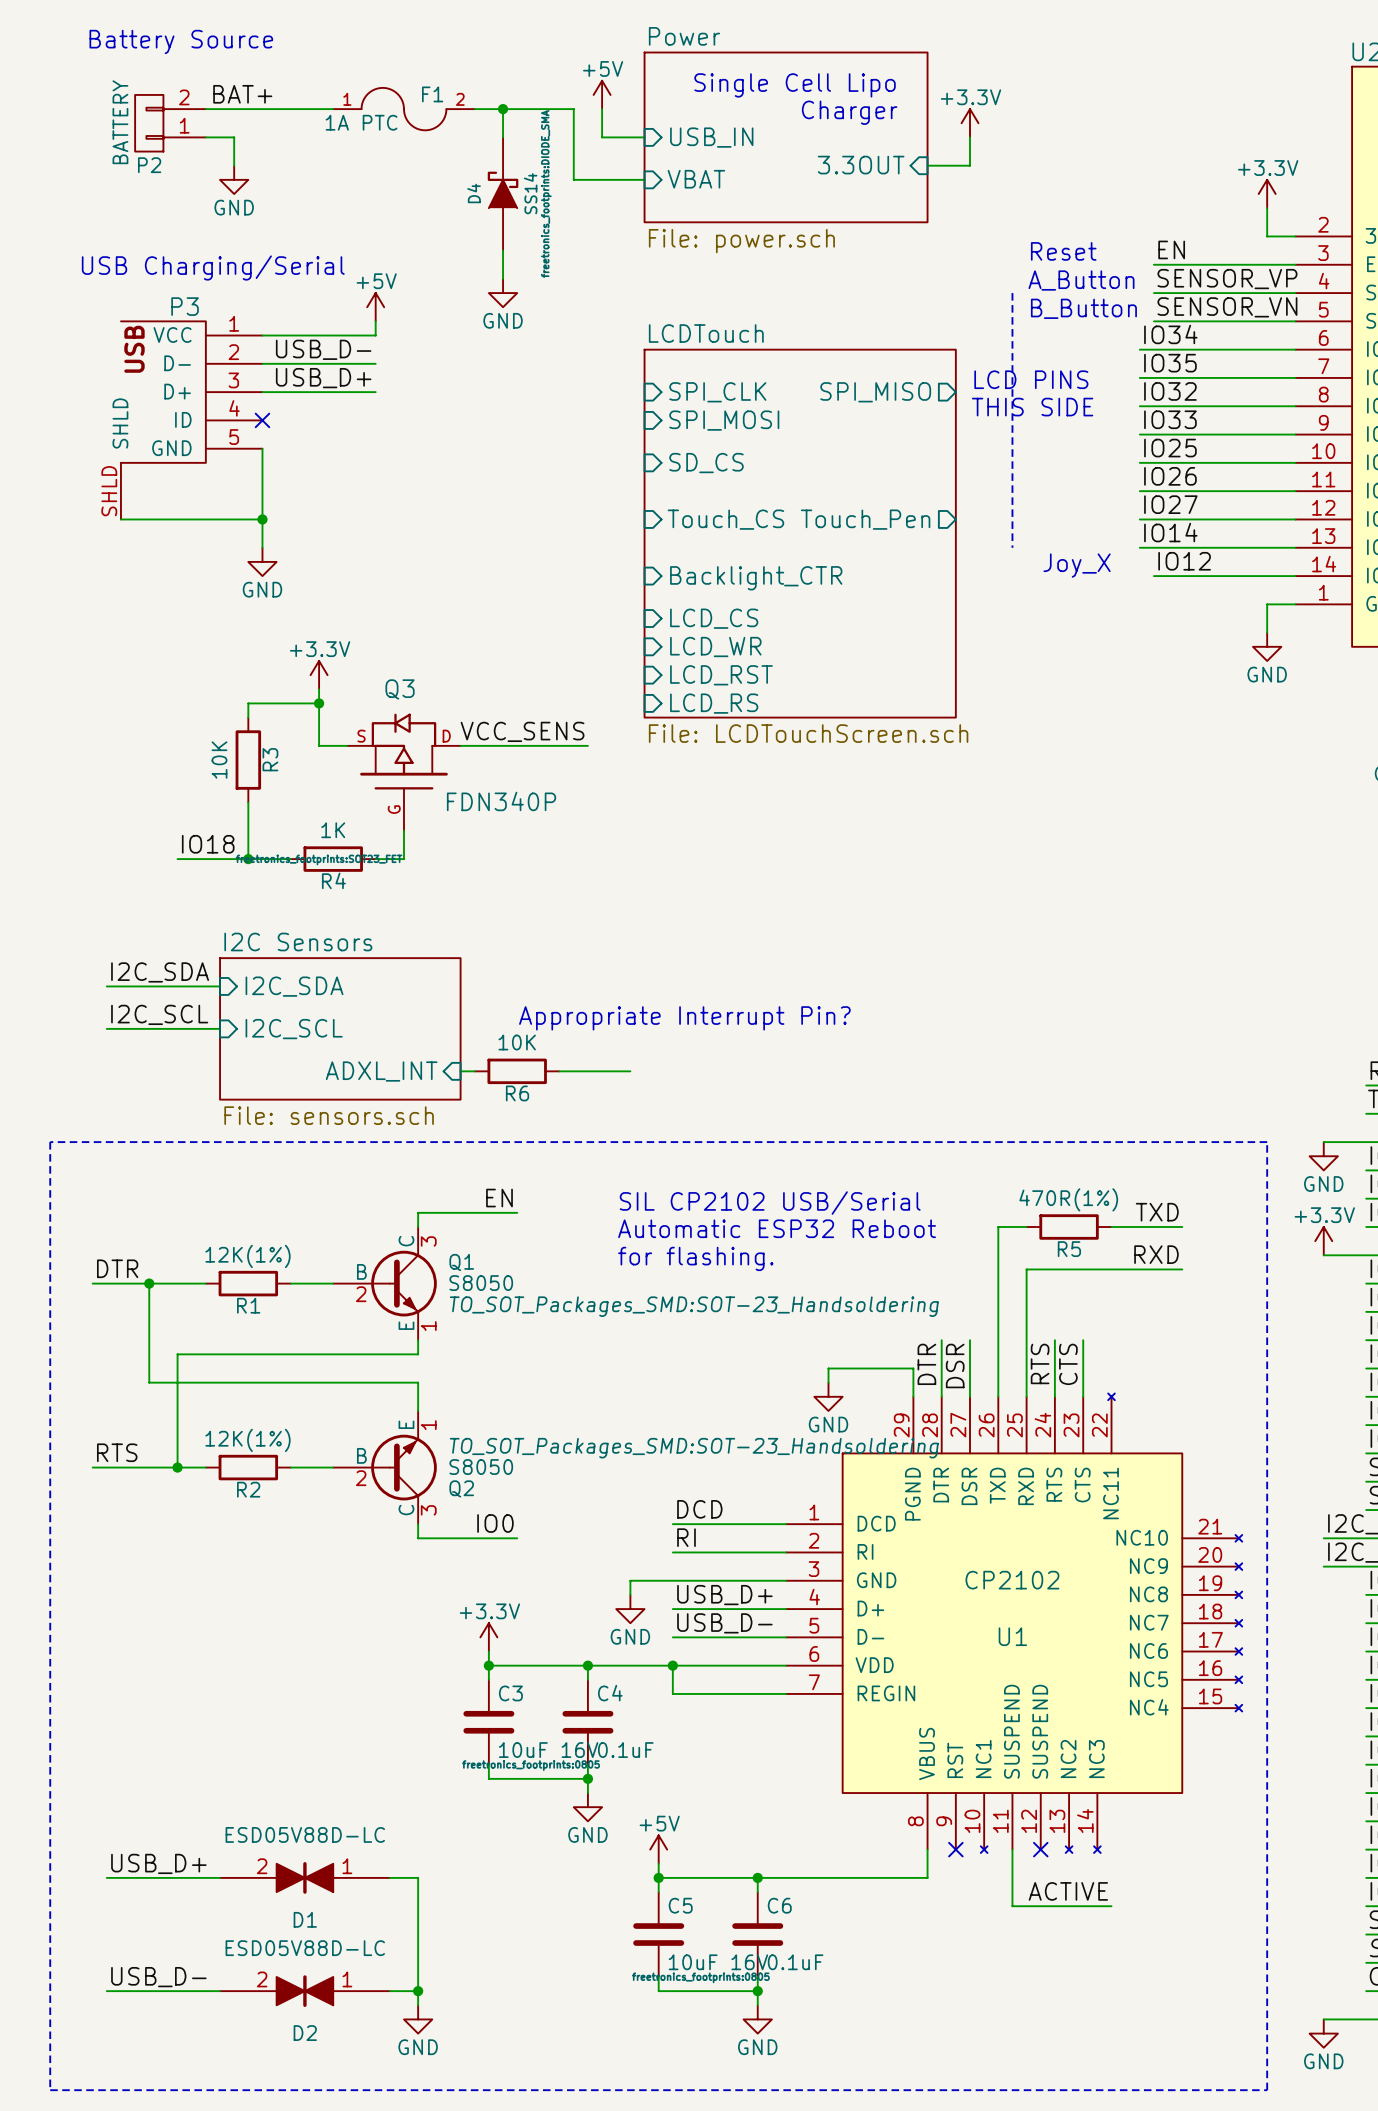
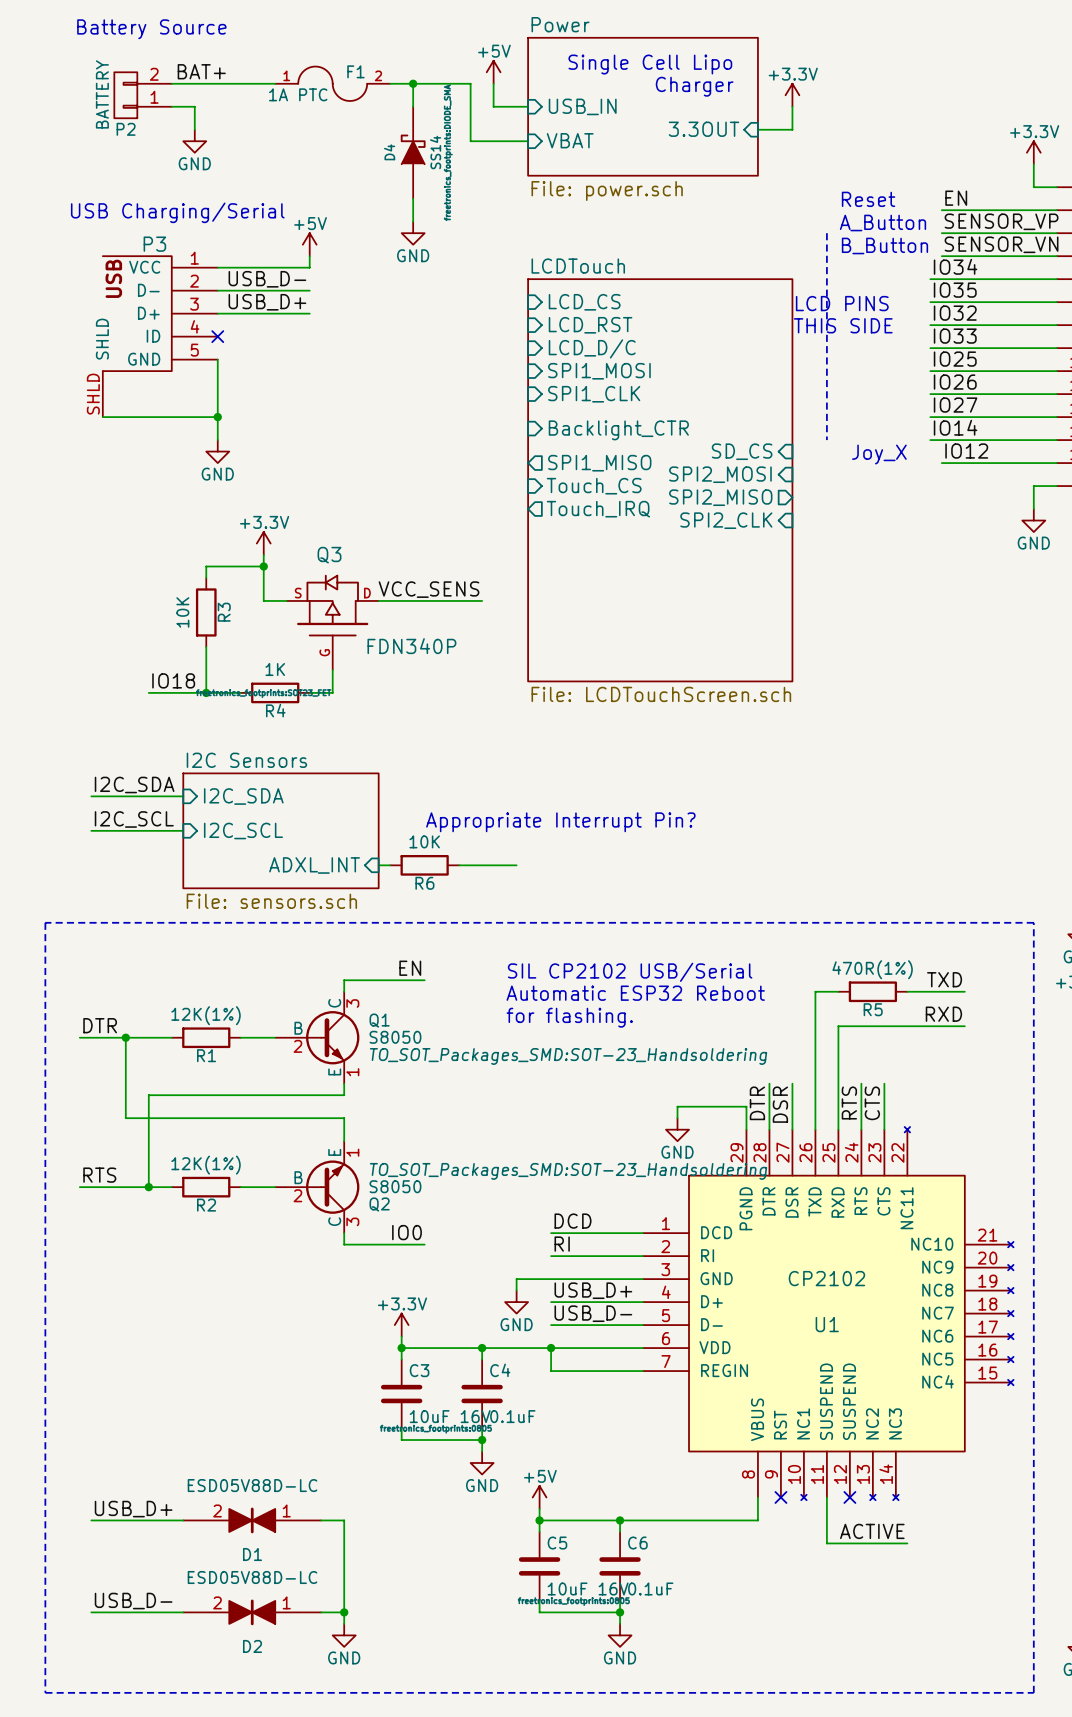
sheet pin: SPI_CLK (717, 392) -> none
sheet pin: SPI_MISO (875, 392) -> none
sheet pin: SPI_MOSI (724, 420) -> none
sheet pin: none -> LCD_D/C (592, 348)
sheet pin: SD_CS (706, 463) -> SPI1_MOSI (599, 371)
sheet pin: none -> SPI1_CLK (594, 394)
sheet pin position: Touch_CS (725, 519) -> Touch_CS (594, 486)
sheet pin: Touch_Pen (865, 519) -> none
sheet LCDTouch: File: LCDTouchScreen.sch (800, 533) -> none
sheet pin: none -> Backlight_CTR (618, 430)
sheet pin: none -> SD_CS (742, 451)
sheet pin shape: input (756, 578) -> output (599, 463)
sheet pin: Backlight_CTR (756, 578) -> SPI1_MISO (599, 463)
sheet pin: none -> SPI2_MOSI (720, 474)
sheet LCDTouch: none -> File: LCDTouchScreen.sch (660, 480)
sheet pin position: LCD_CS (714, 618) -> LCD_CS (584, 302)
sheet pin: none -> SPI2_MISO (720, 497)
sheet pin: none -> Touch_IRQ (598, 509)
sheet pin: LCD_WR (715, 647) -> none
sheet pin: none -> SPI2_CLK (726, 520)
sheet pin position: LCD_RST (721, 675) -> LCD_RST (590, 325)
sheet pin: LCD_RS (714, 703) -> none

